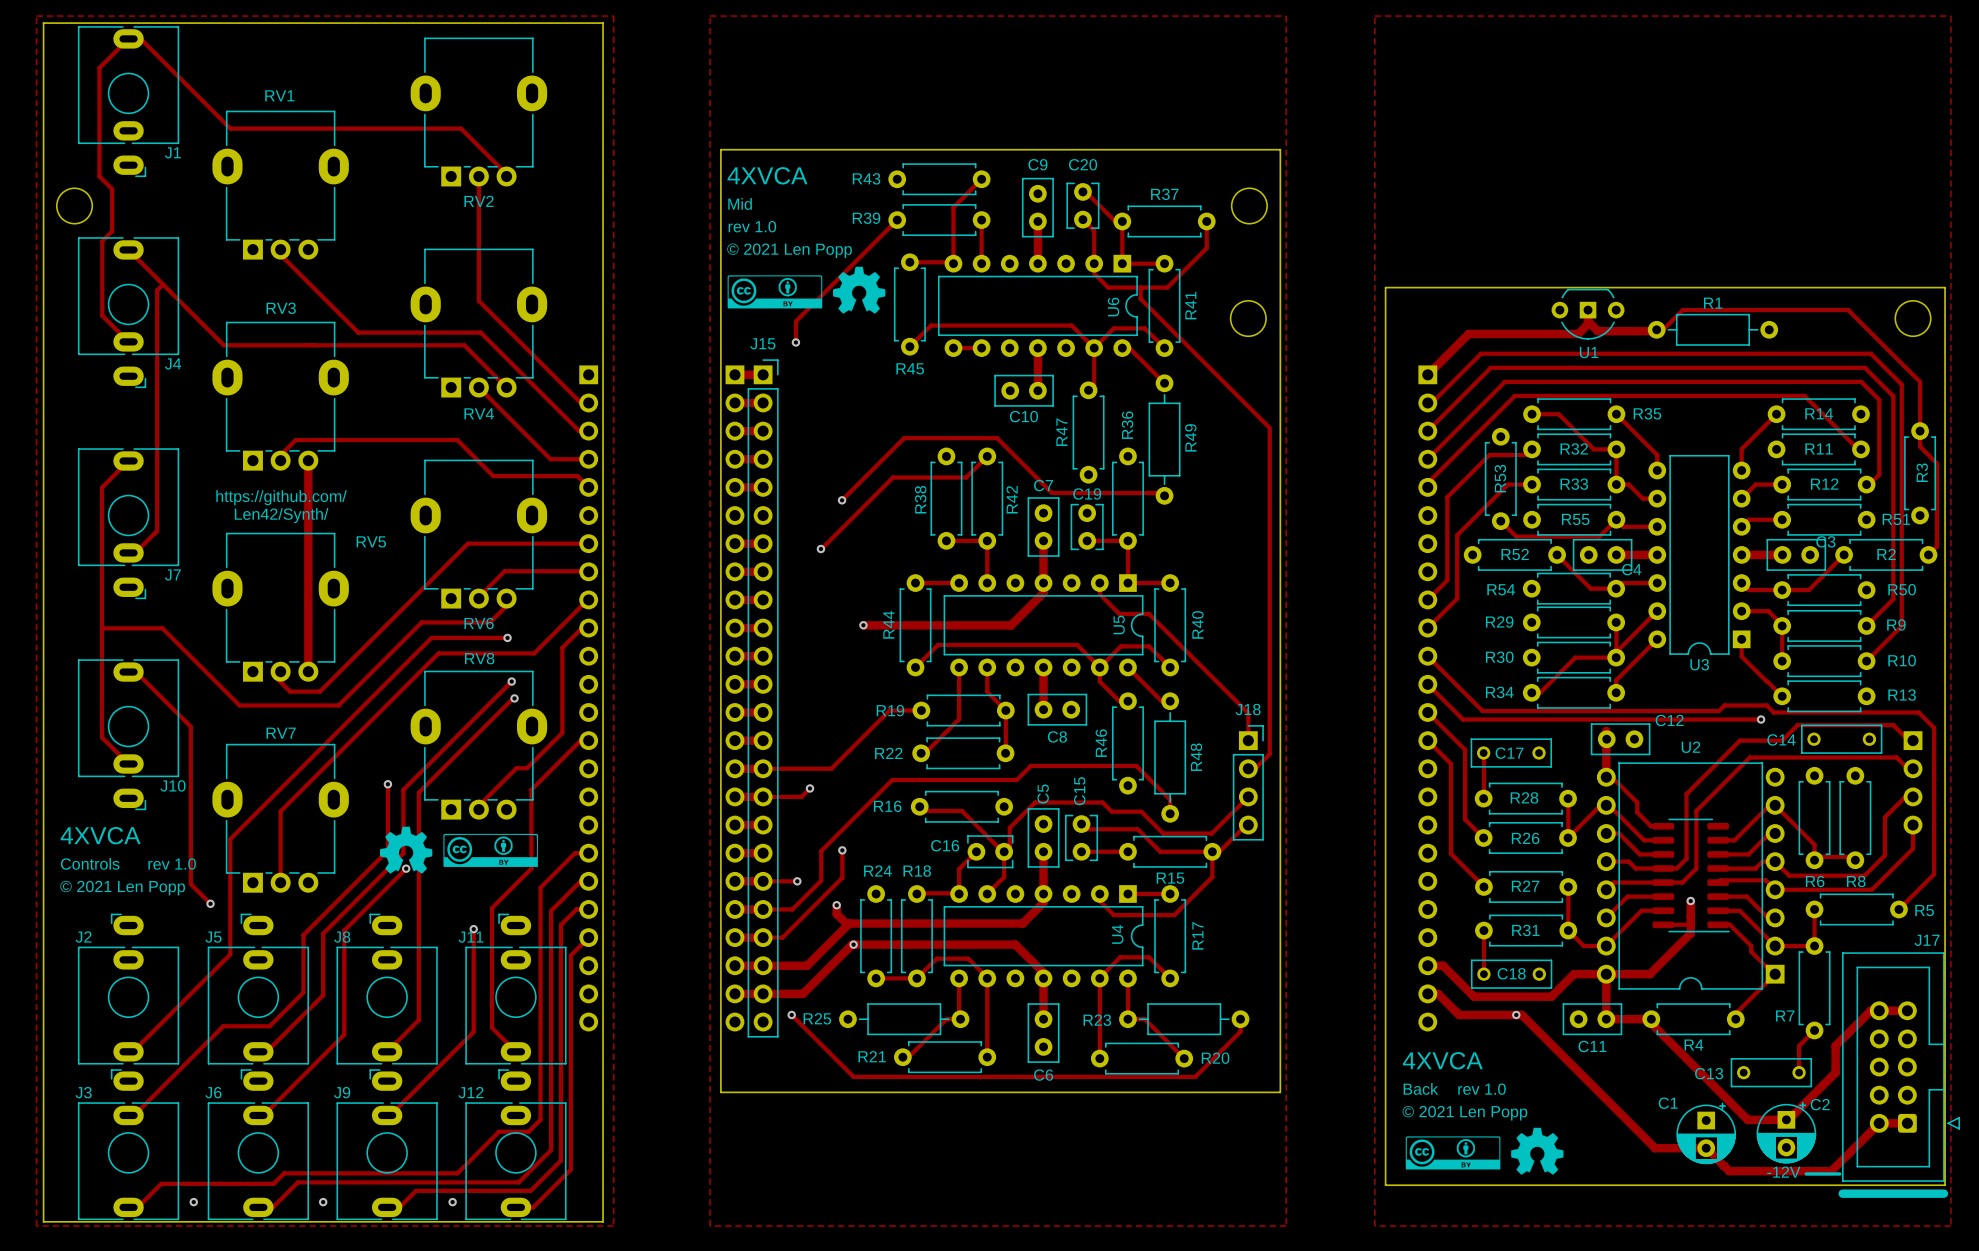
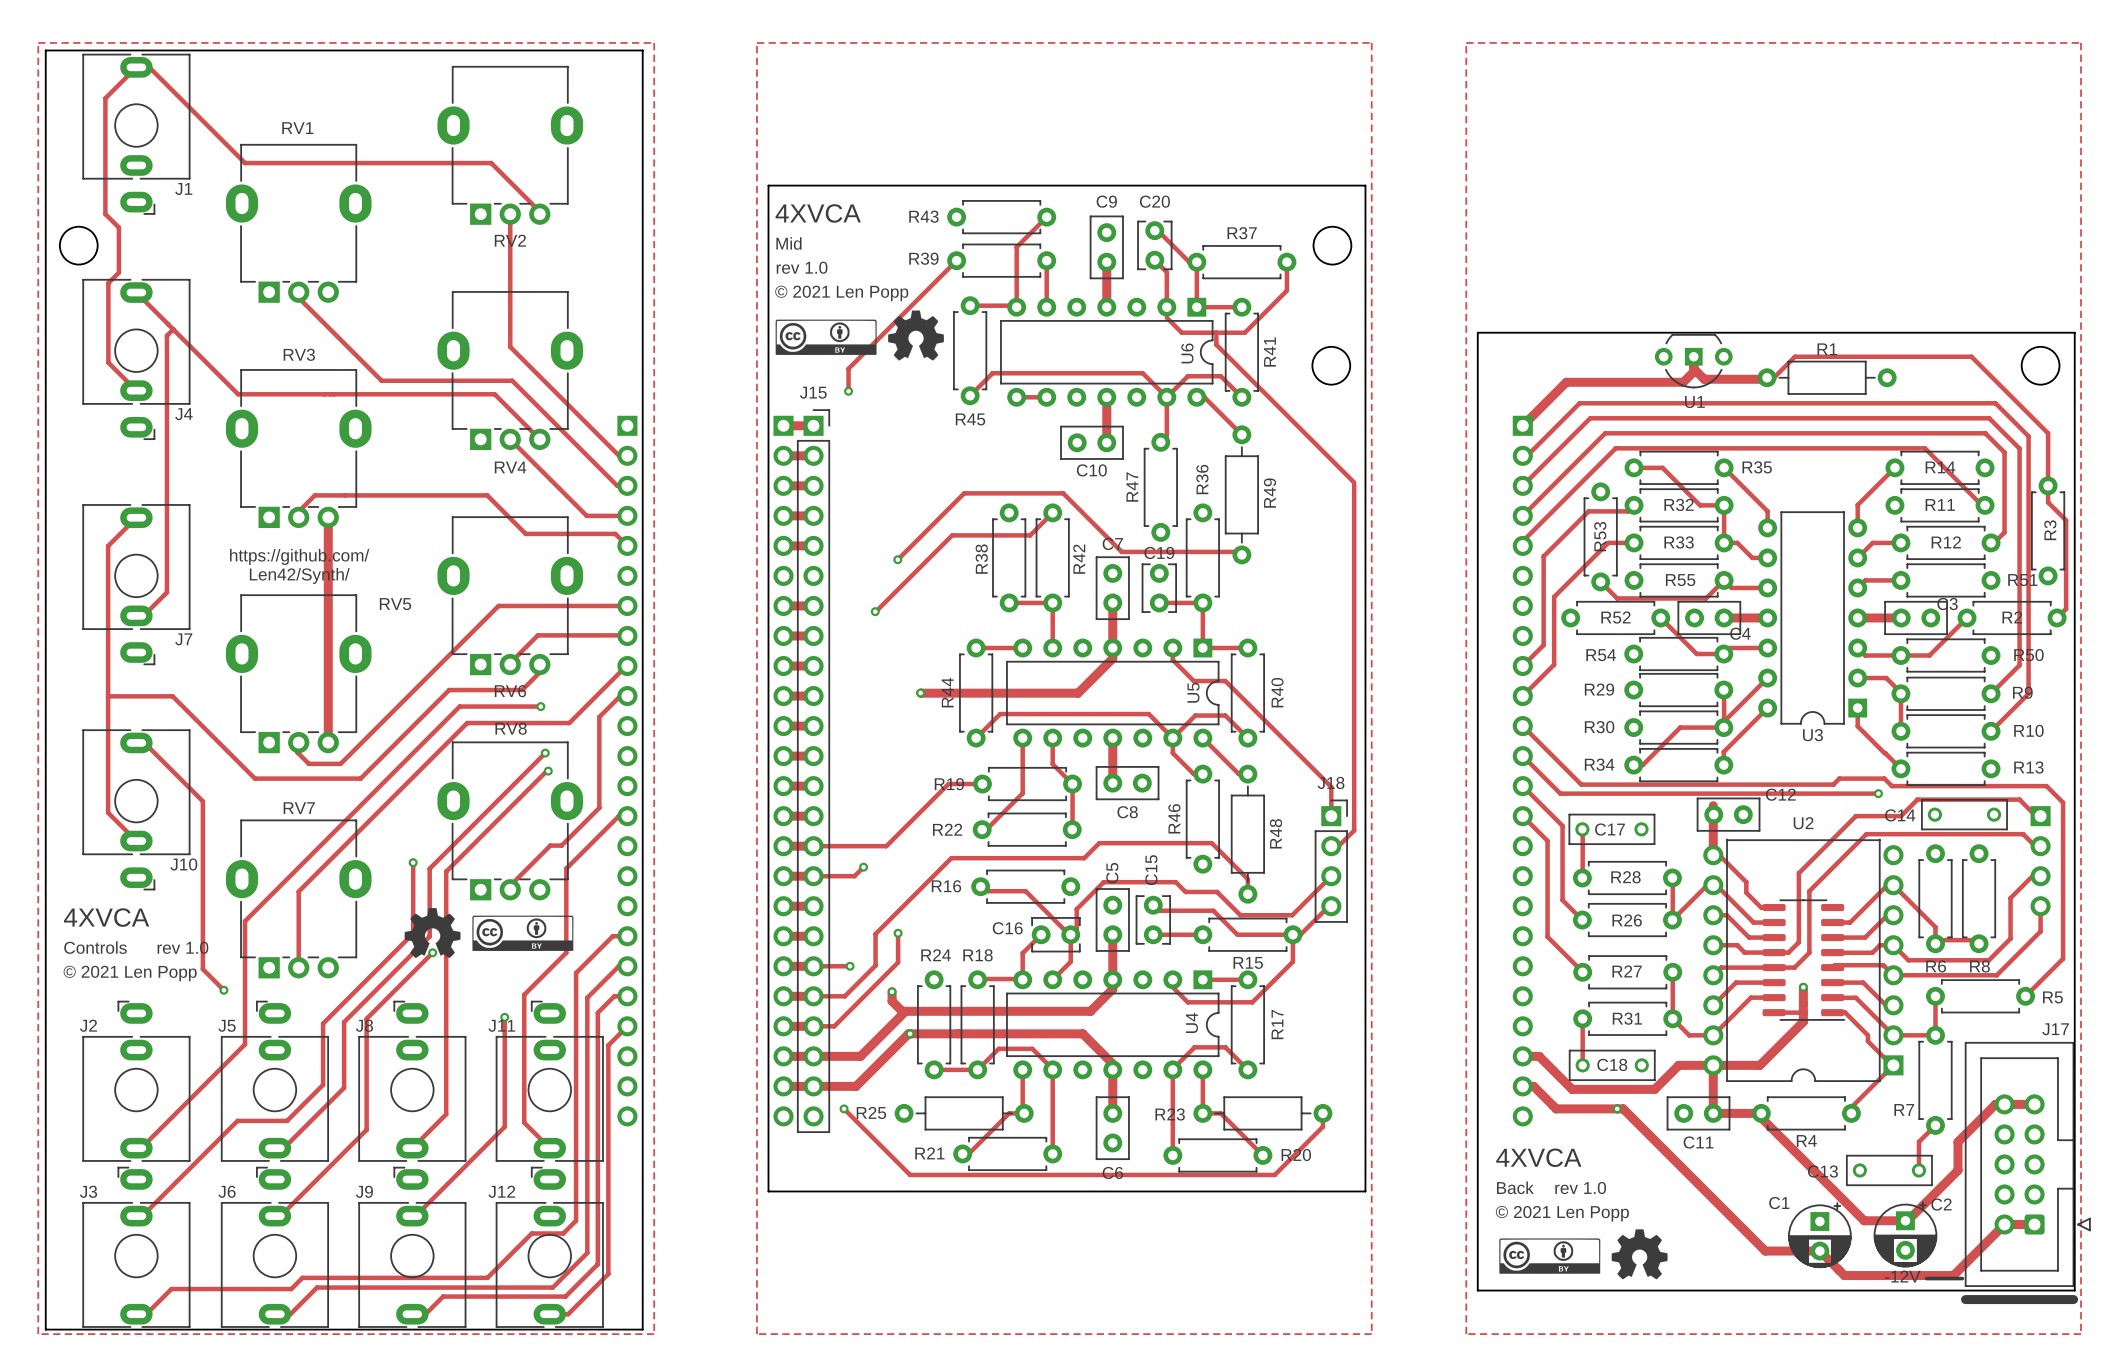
via: (193, 1202) -> none
via: (323, 1202) -> none
via: (452, 1202) -> none

